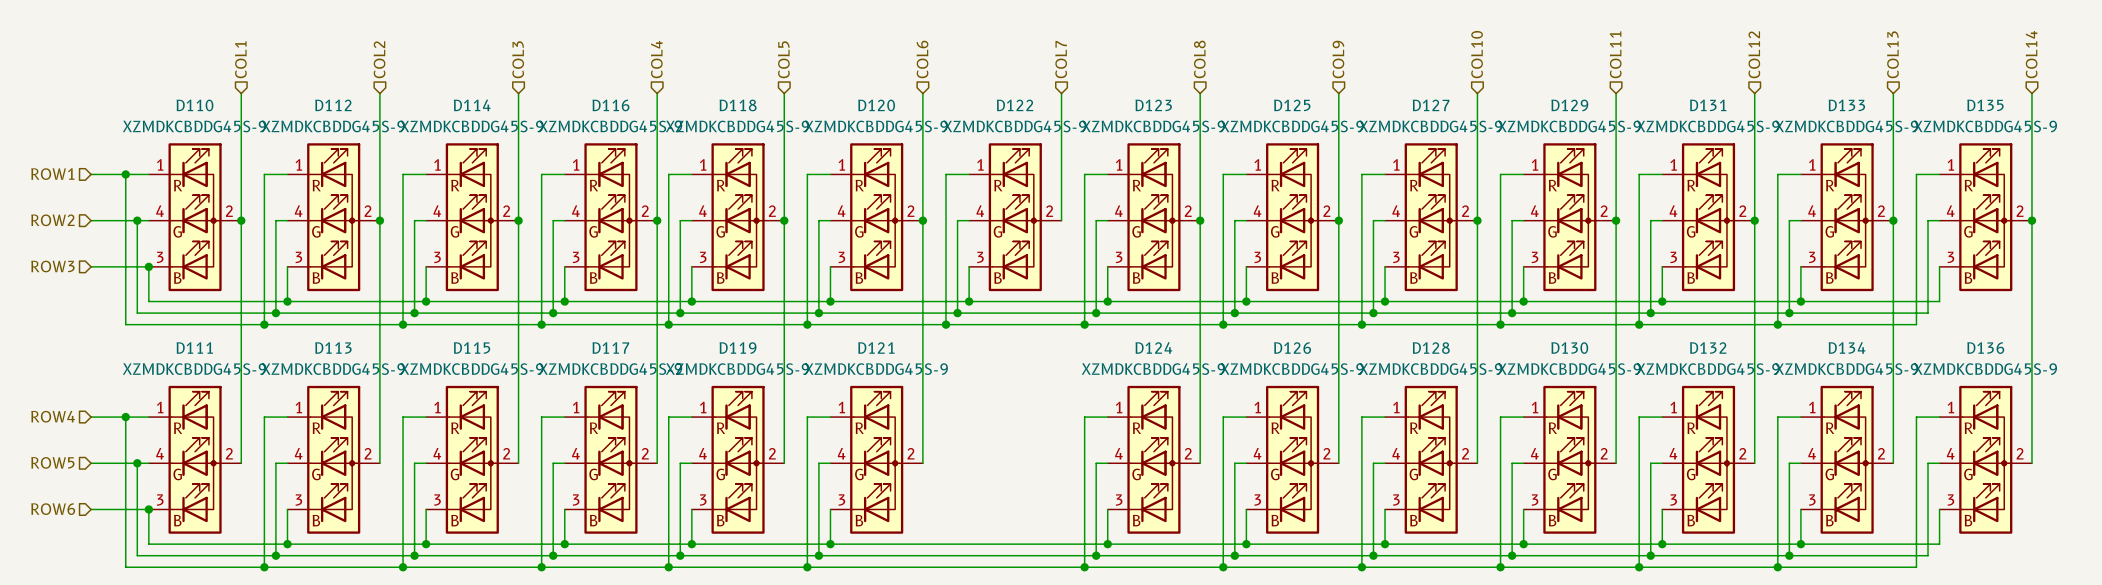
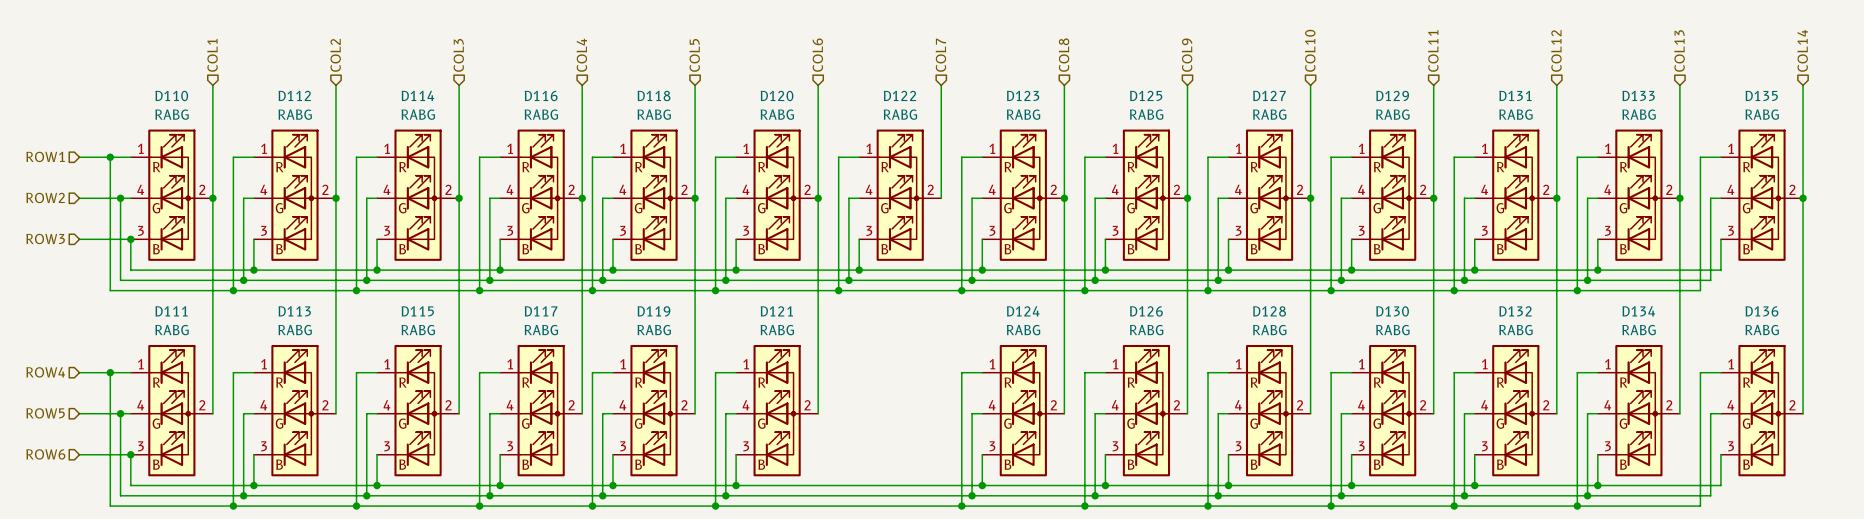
D110 value: XZMDKCBDDG45S-9 (194, 126) -> RABG (172, 114)
D112 value: XZMDKCBDDG45S-9 (333, 126) -> RABG (295, 114)
D114 value: XZMDKCBDDG45S-9 (471, 126) -> RABG (418, 114)
D116 value: XZMDKCBDDG45S-9 (610, 126) -> RABG (541, 114)
D118 value: XZMDKCBDDG45S-9 (737, 126) -> RABG (654, 114)
D120 value: XZMDKCBDDG45S-9 (876, 126) -> RABG (777, 114)
D122 value: XZMDKCBDDG45S-9 (1014, 126) -> RABG (900, 114)
D123 value: XZMDKCBDDG45S-9 (1153, 126) -> RABG (1023, 114)
D125 value: XZMDKCBDDG45S-9 (1292, 126) -> RABG (1146, 114)
D127 value: XZMDKCBDDG45S-9 (1430, 126) -> RABG (1269, 114)
D129 value: XZMDKCBDDG45S-9 (1569, 126) -> RABG (1392, 114)
D131 value: XZMDKCBDDG45S-9 (1708, 126) -> RABG (1515, 114)
D133 value: XZMDKCBDDG45S-9 (1846, 126) -> RABG (1639, 114)
D135 value: XZMDKCBDDG45S-9 (1985, 126) -> RABG (1762, 114)
D111 value: XZMDKCBDDG45S-9 (194, 369) -> RABG (172, 330)
D113 value: XZMDKCBDDG45S-9 (333, 369) -> RABG (295, 330)
D115 value: XZMDKCBDDG45S-9 (471, 369) -> RABG (418, 330)
D117 value: XZMDKCBDDG45S-9 (610, 369) -> RABG (541, 330)
D119 value: XZMDKCBDDG45S-9 (737, 369) -> RABG (654, 330)
D121 value: XZMDKCBDDG45S-9 (876, 369) -> RABG (777, 330)
D124 value: XZMDKCBDDG45S-9 (1153, 369) -> RABG (1023, 330)
D126 value: XZMDKCBDDG45S-9 (1292, 369) -> RABG (1146, 330)
D128 value: XZMDKCBDDG45S-9 (1430, 369) -> RABG (1269, 330)
D130 value: XZMDKCBDDG45S-9 (1569, 369) -> RABG (1392, 330)
D132 value: XZMDKCBDDG45S-9 (1708, 369) -> RABG (1515, 330)
D134 value: XZMDKCBDDG45S-9 (1846, 369) -> RABG (1639, 330)
D136 value: XZMDKCBDDG45S-9 (1985, 369) -> RABG (1762, 330)

